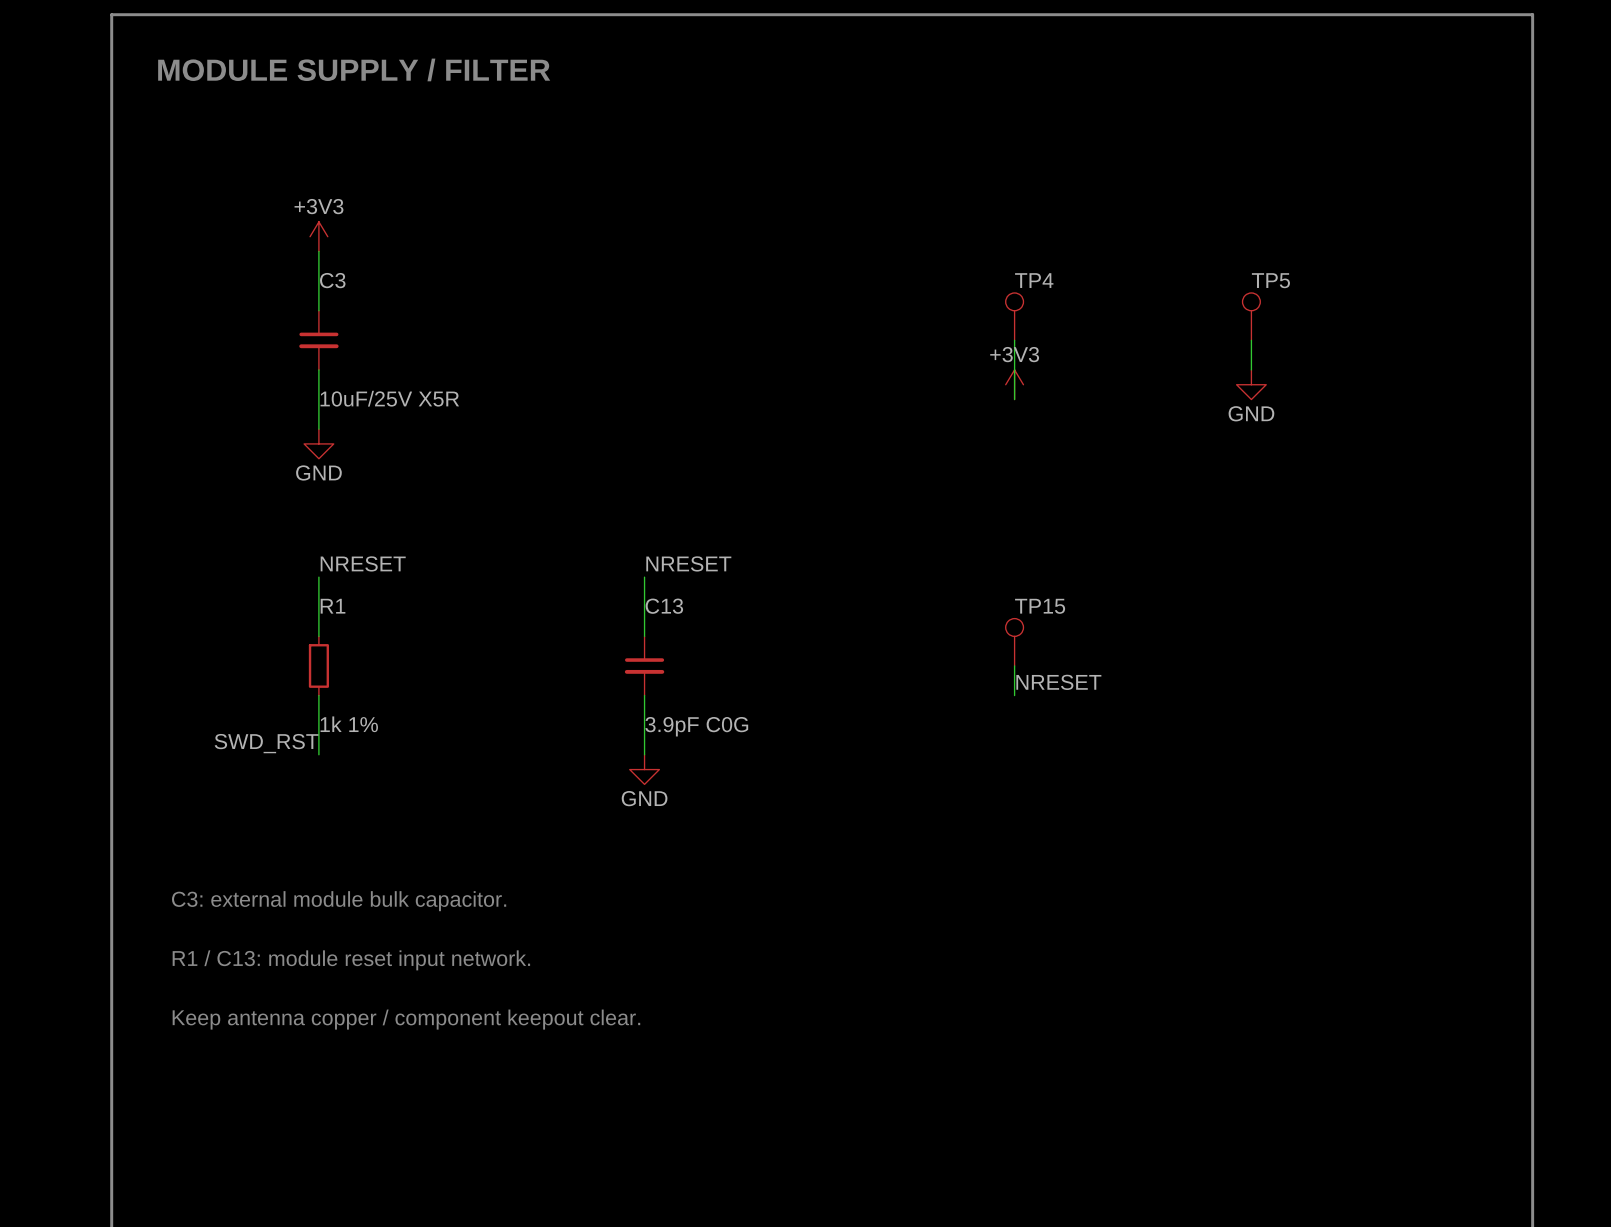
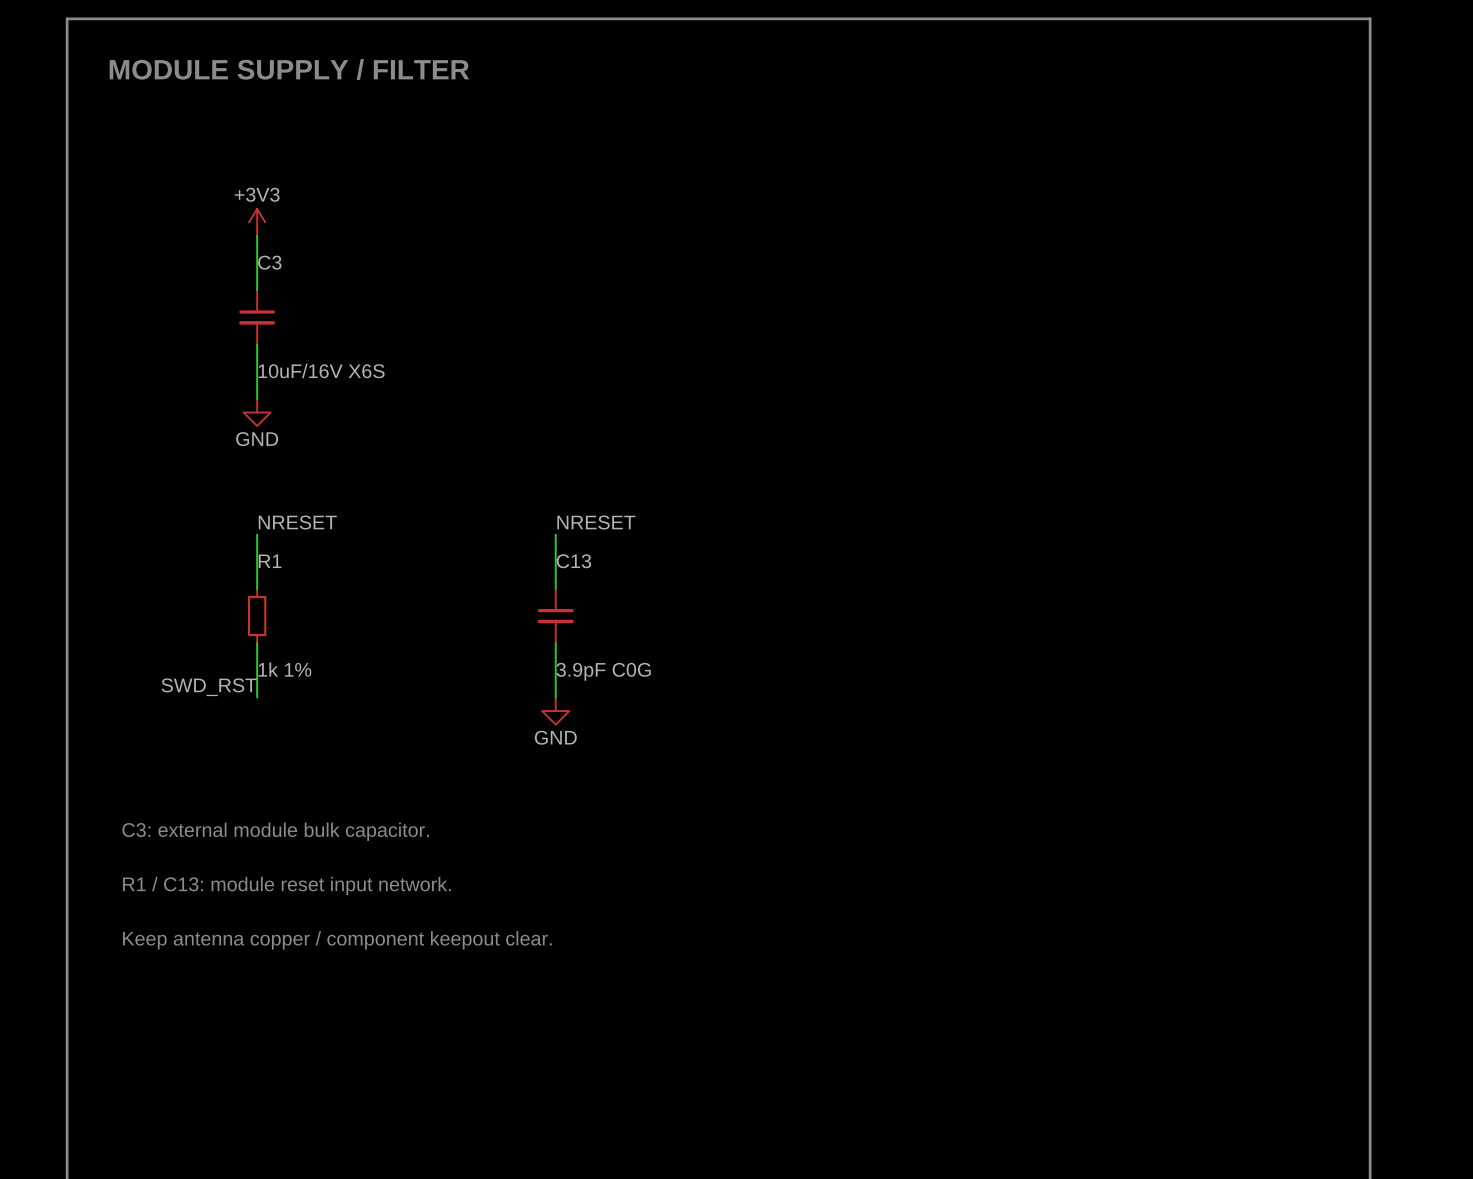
TP4: (1014, 316) -> none
TP5: (1251, 316) -> none
wire: (1014, 340) (1014, 399) -> none
wire: (1251, 340) (1251, 369) -> none
power symbol: +3V3 (1014, 384) -> none
power symbol: GND (1251, 384) -> none
C3 value: 10uF/25V X5R (389, 398) -> 10uF/16V X6S (321, 370)
TP15: (1014, 642) -> none
wire: (1014, 665) (1014, 695) -> none
label: NRESET (1058, 682) -> none

